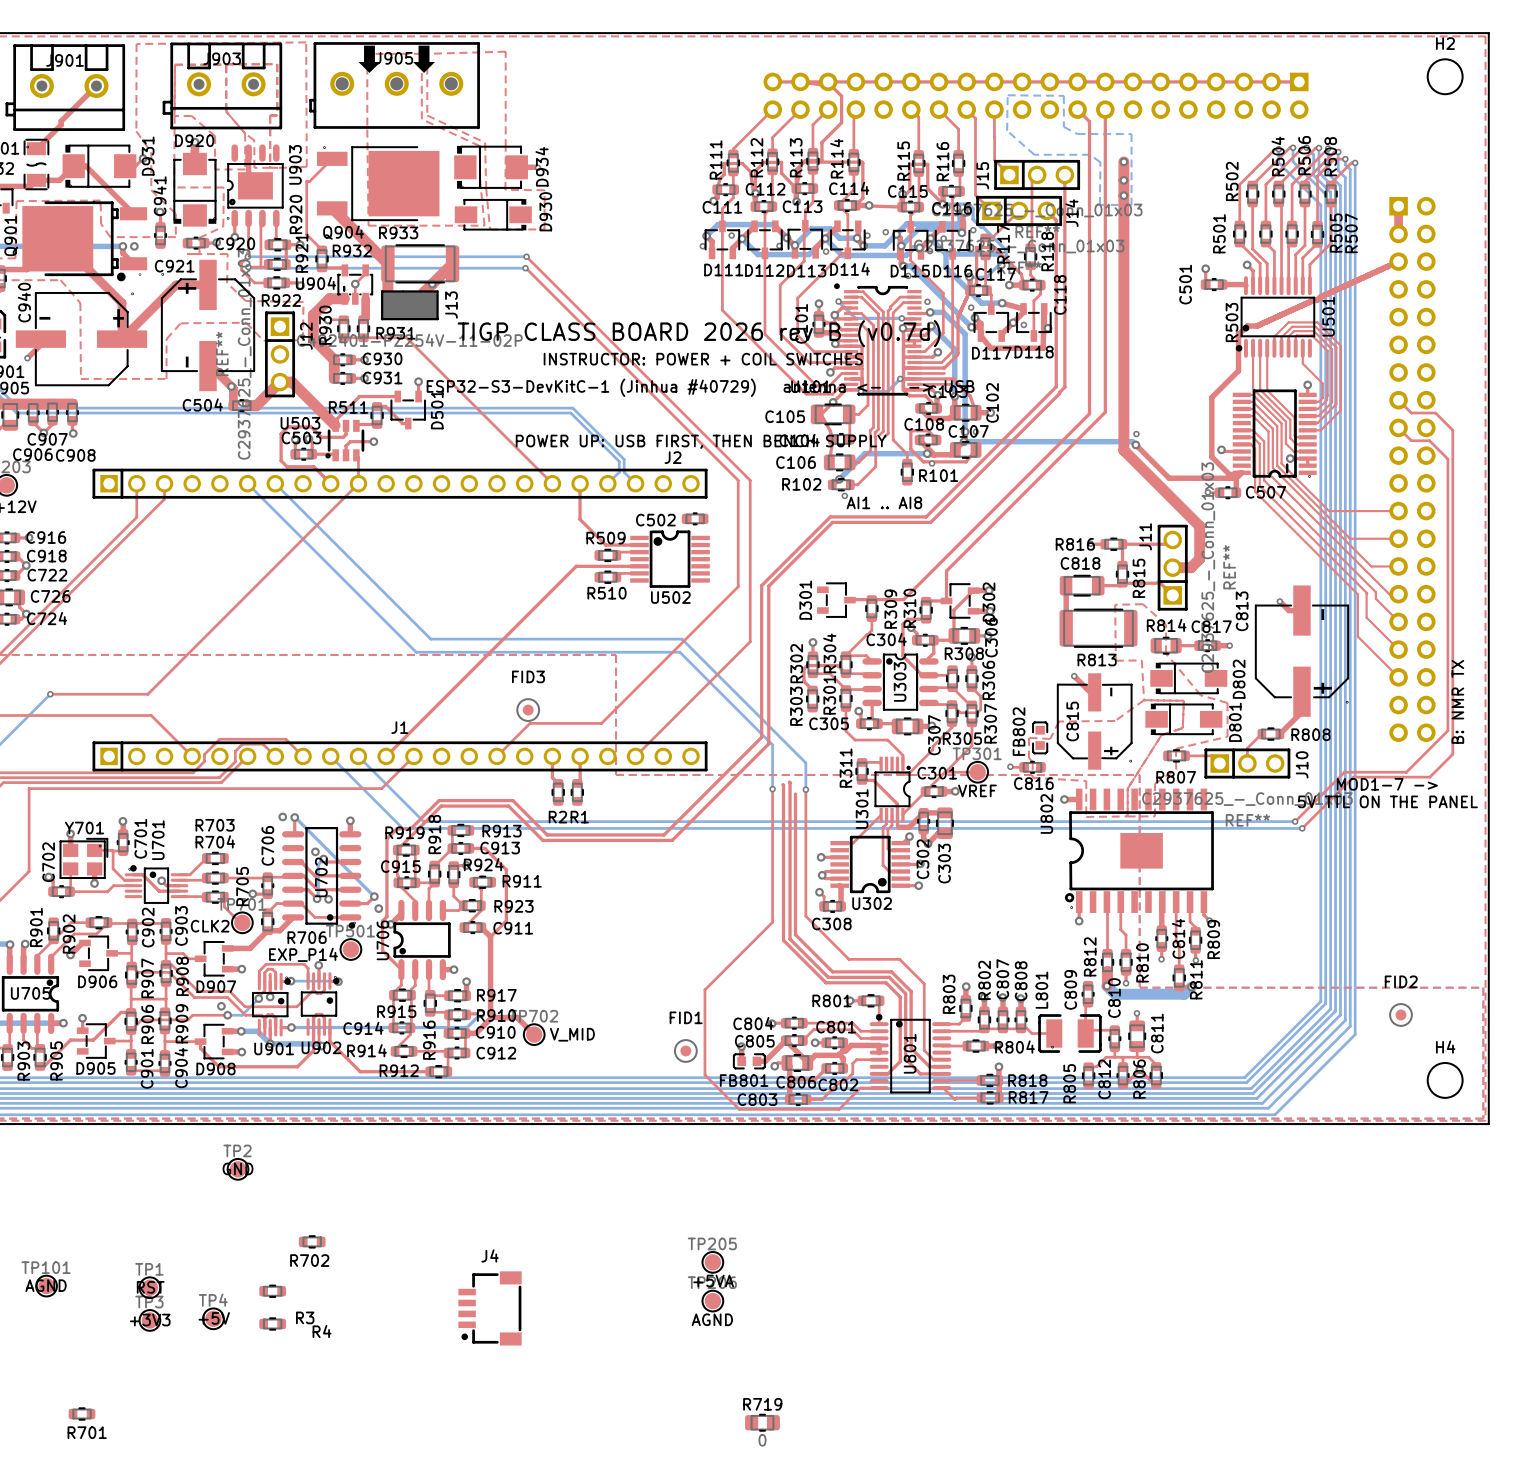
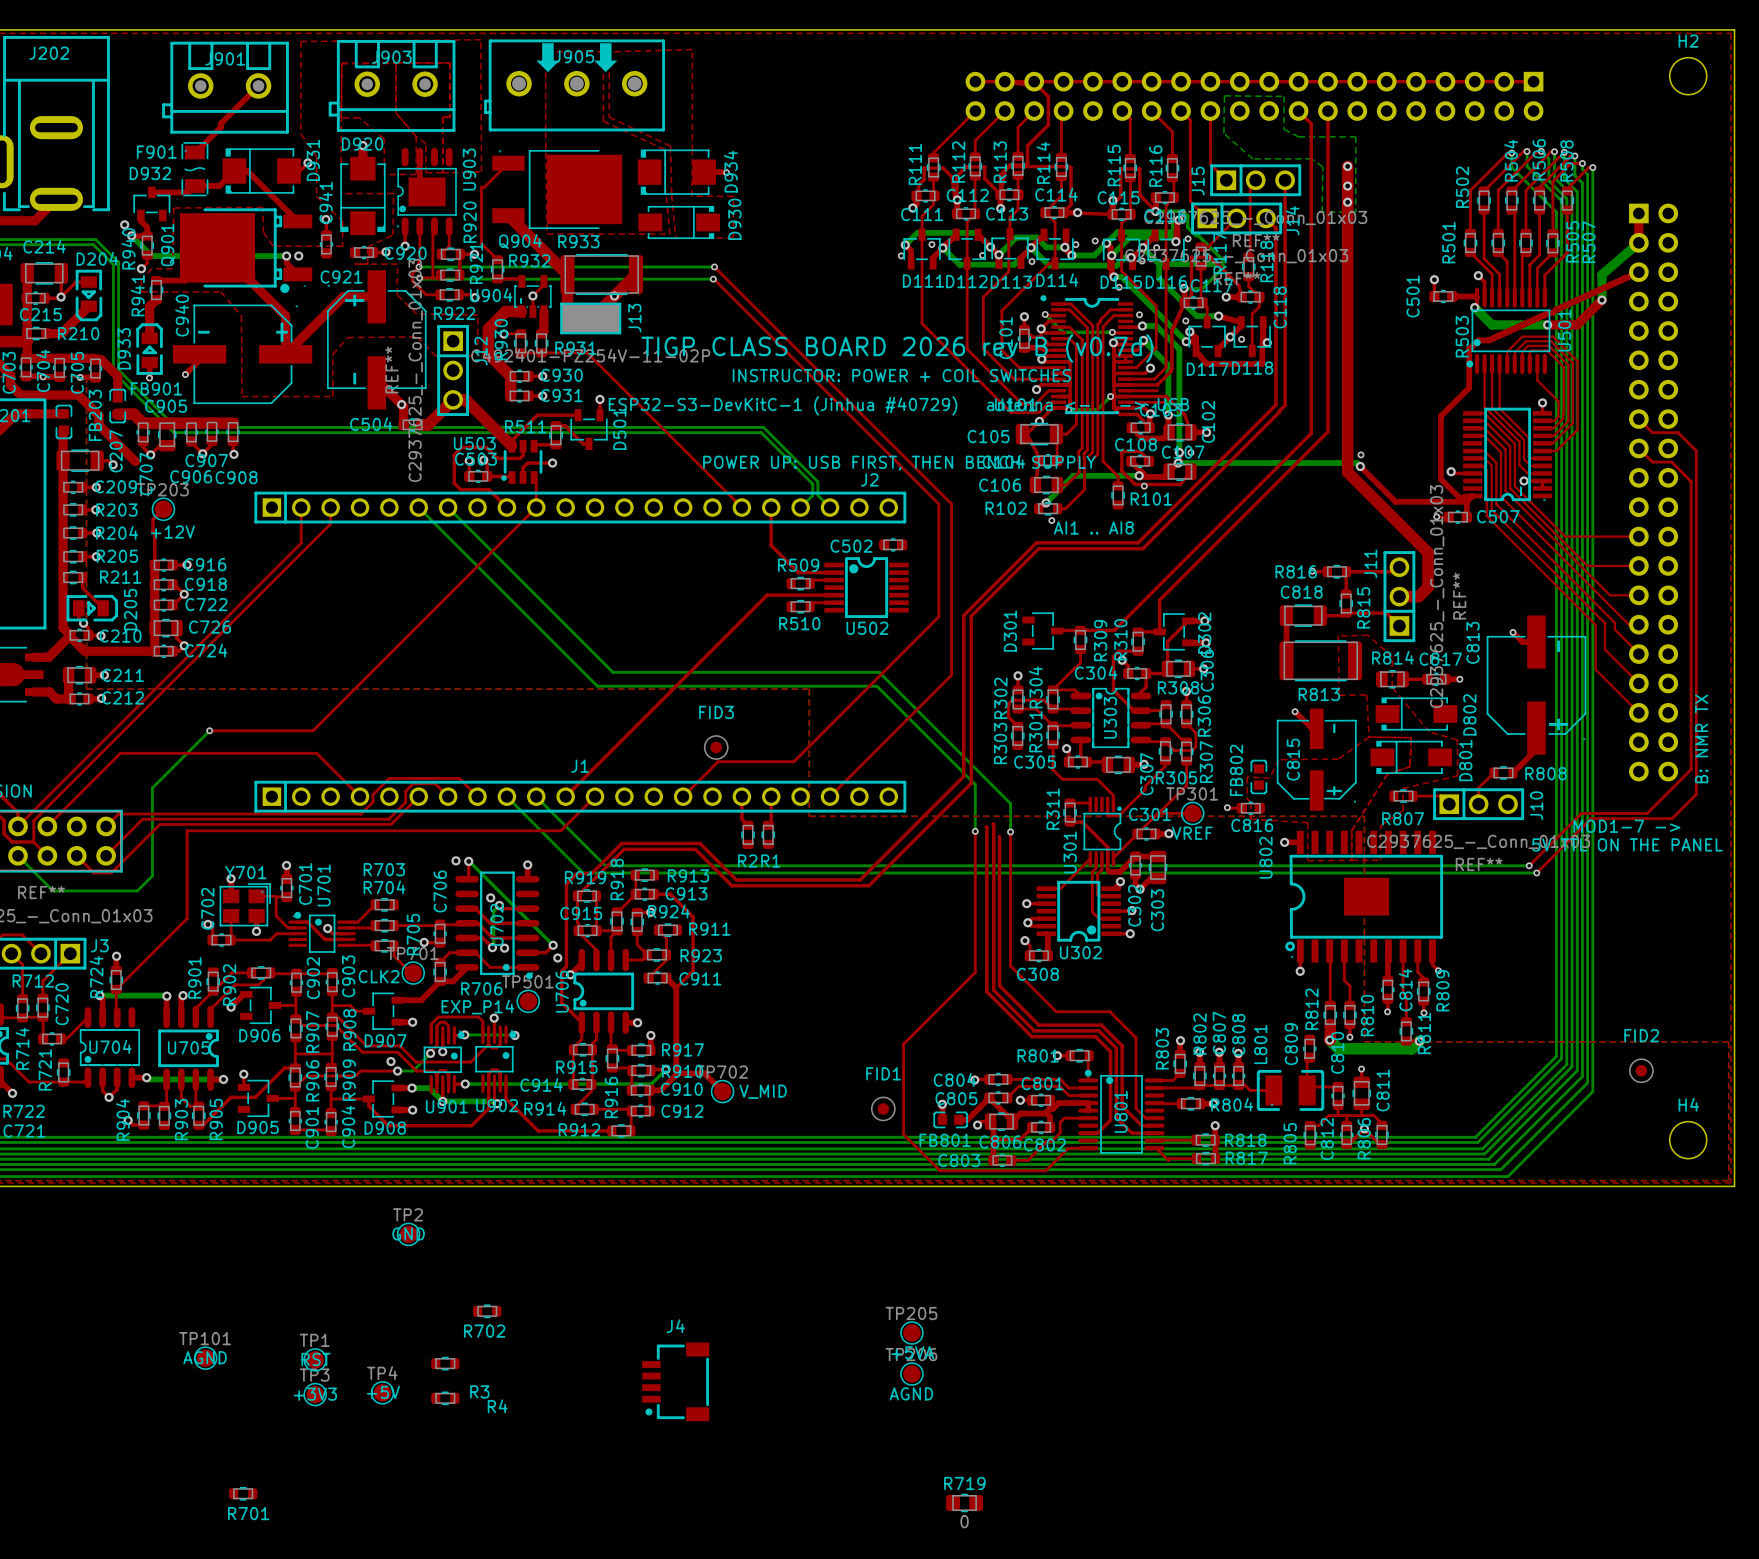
bottom track: none -> (1638, 242) (1601, 274) (1601, 300)
top track: none -> (1601, 300) (1577, 324) (1547, 324)
via: none -> (1601, 300)
bottom track: none -> (1474, 307) (1492, 324) (1547, 324)
via: none -> (1474, 307)
via: none -> (1547, 324)

